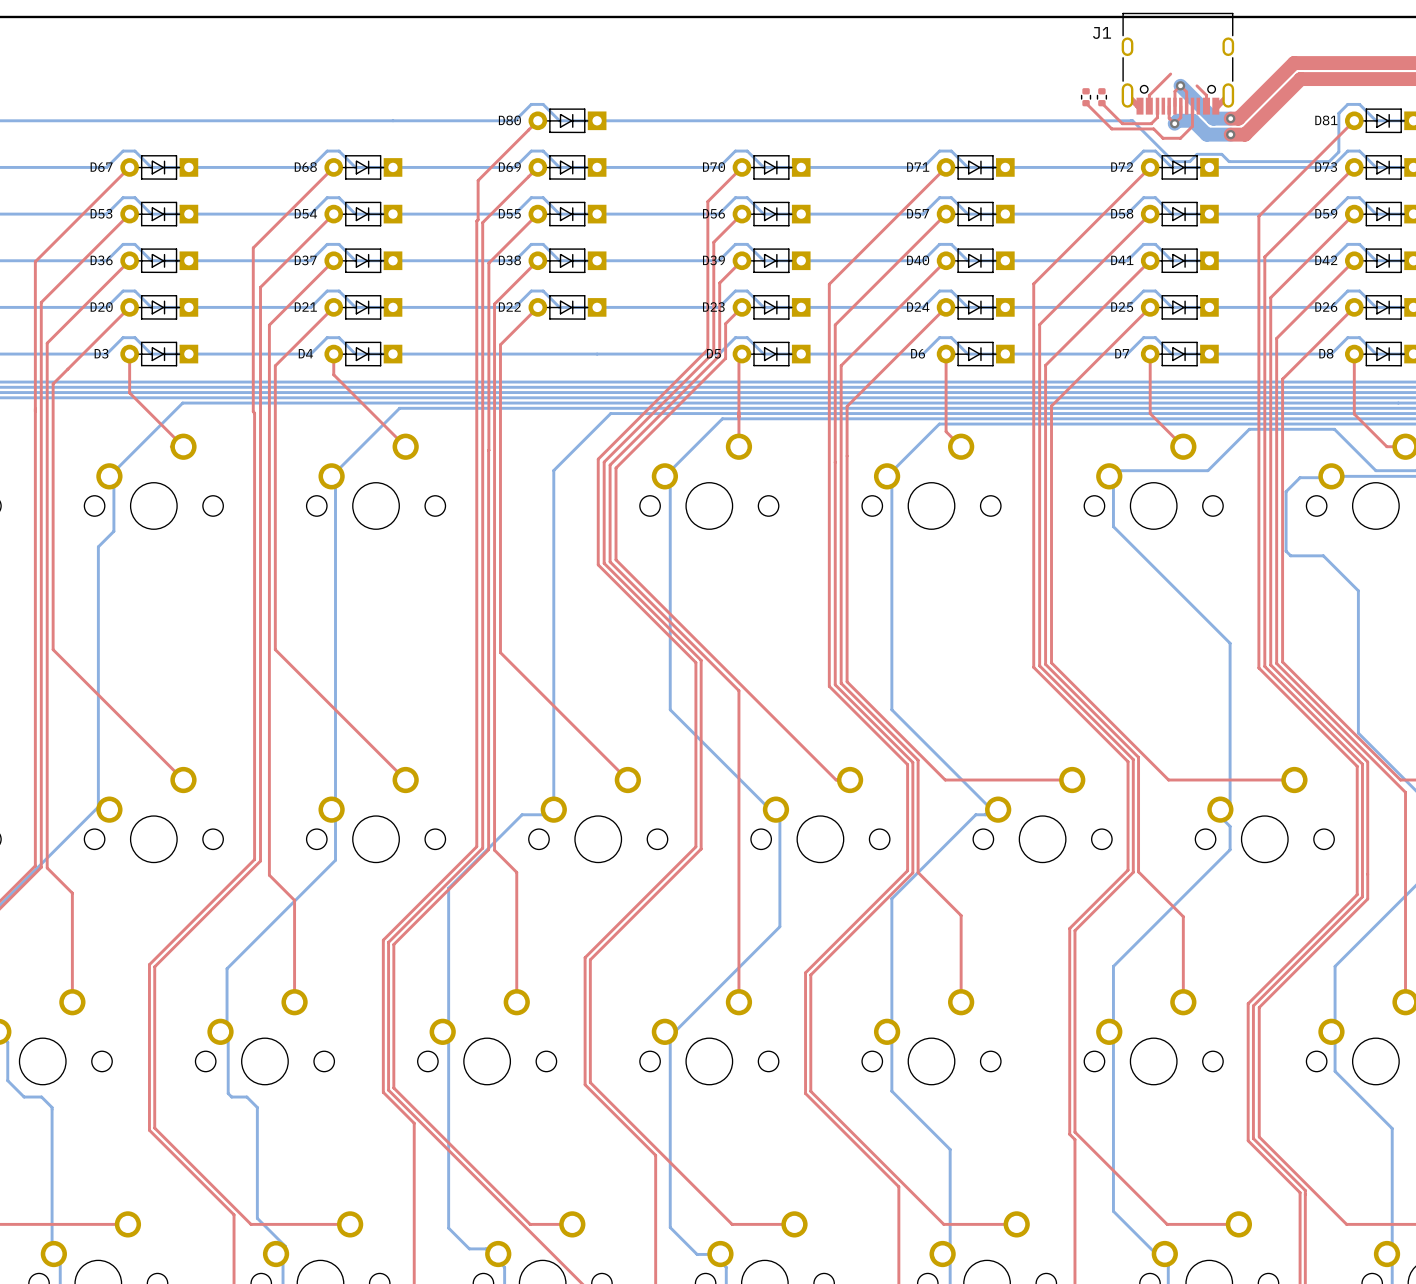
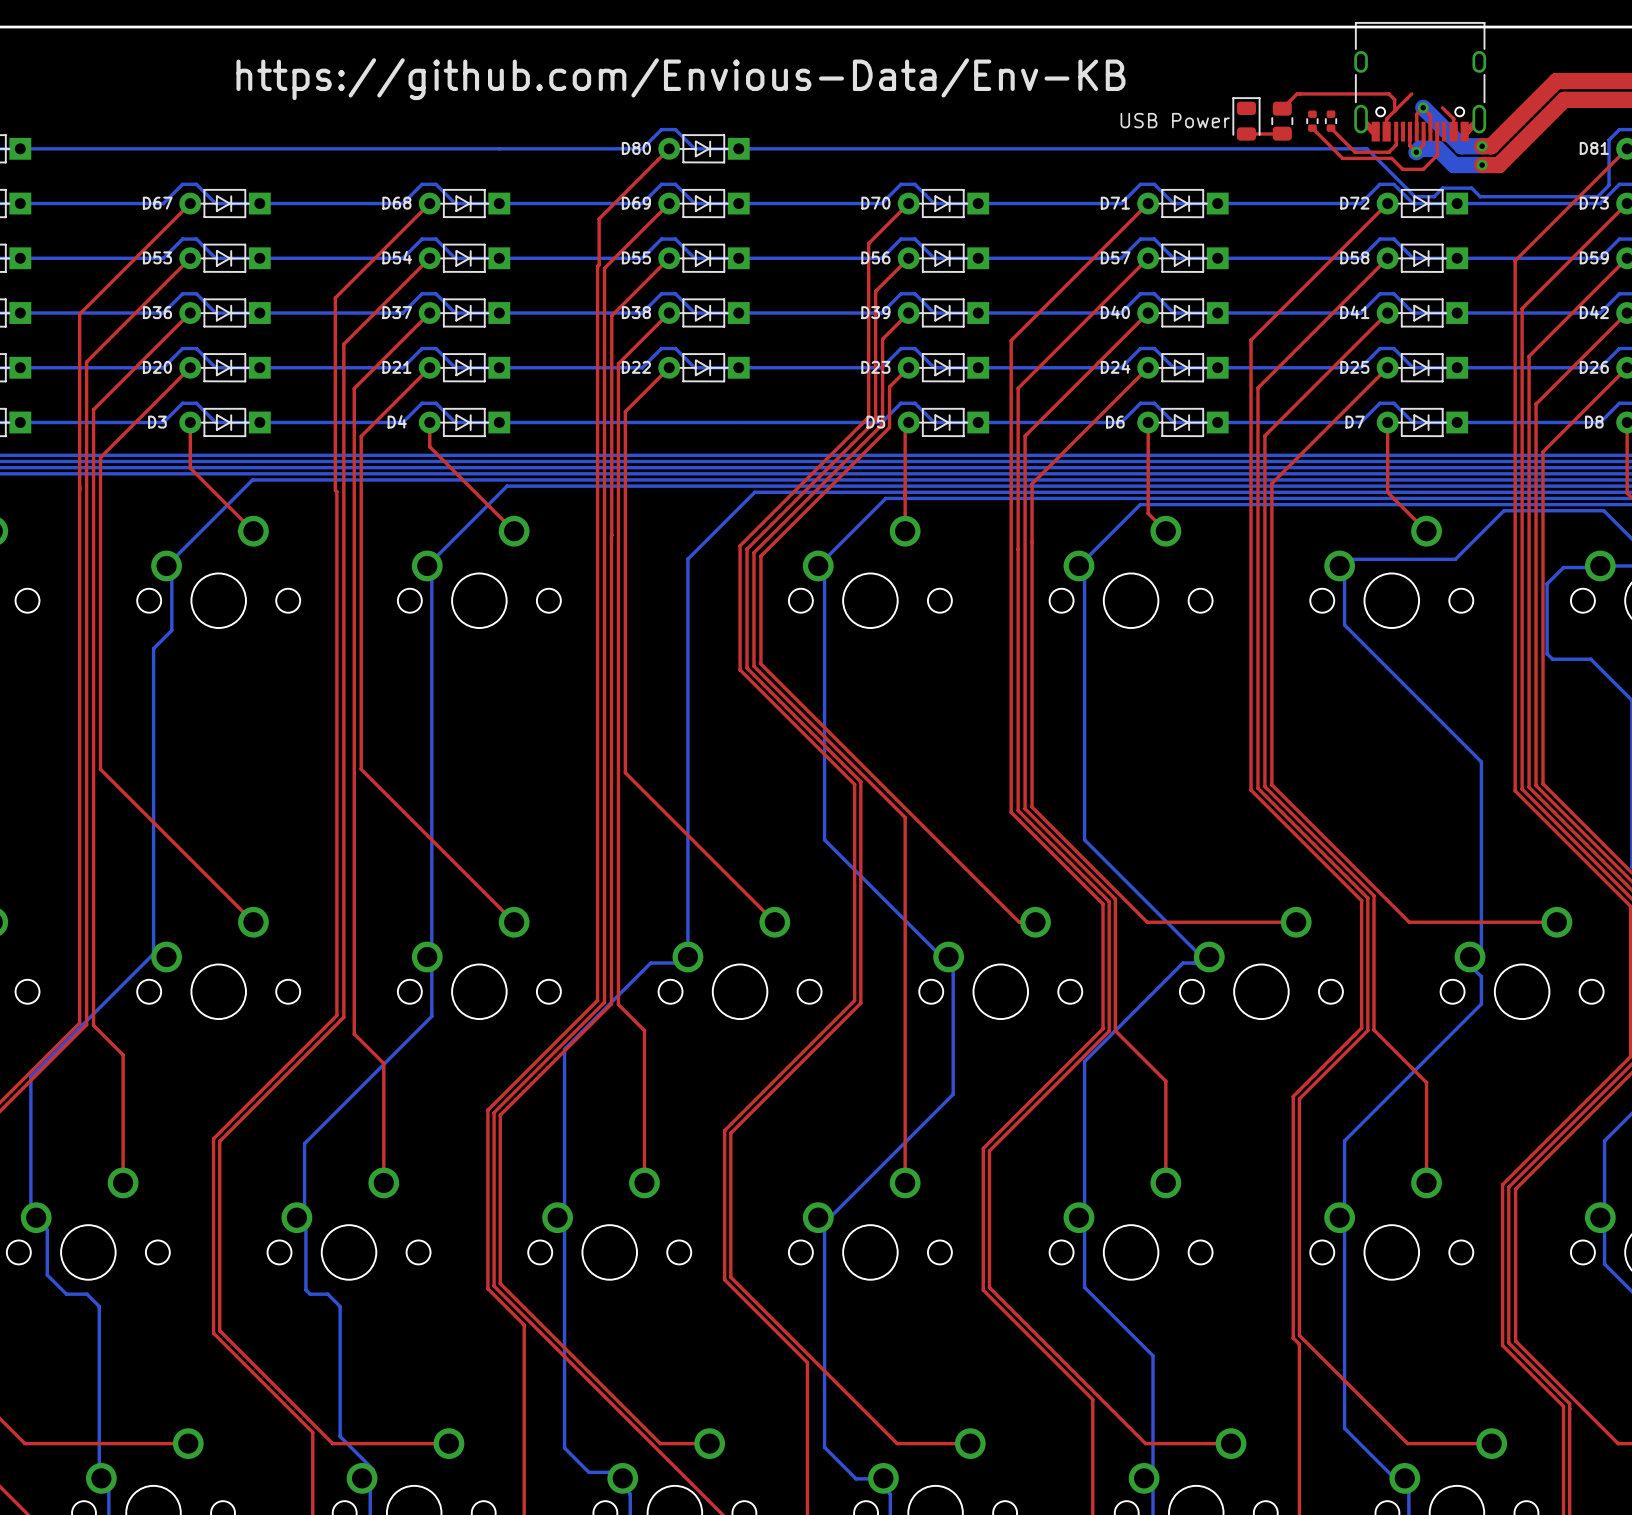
J1 name: J1 (1102, 32) -> none
text: none -> https://github.com/Envious-Data/Env-KB (680, 79)
top track: none -> (1282, 108) (1297, 93) (1388, 93) (1394, 99) (1394, 110)
part: none -> (1246, 118)
text: none -> USB Power (1175, 120)
part: none -> (1282, 121)
top track: none -> (1246, 133) (1282, 133)

